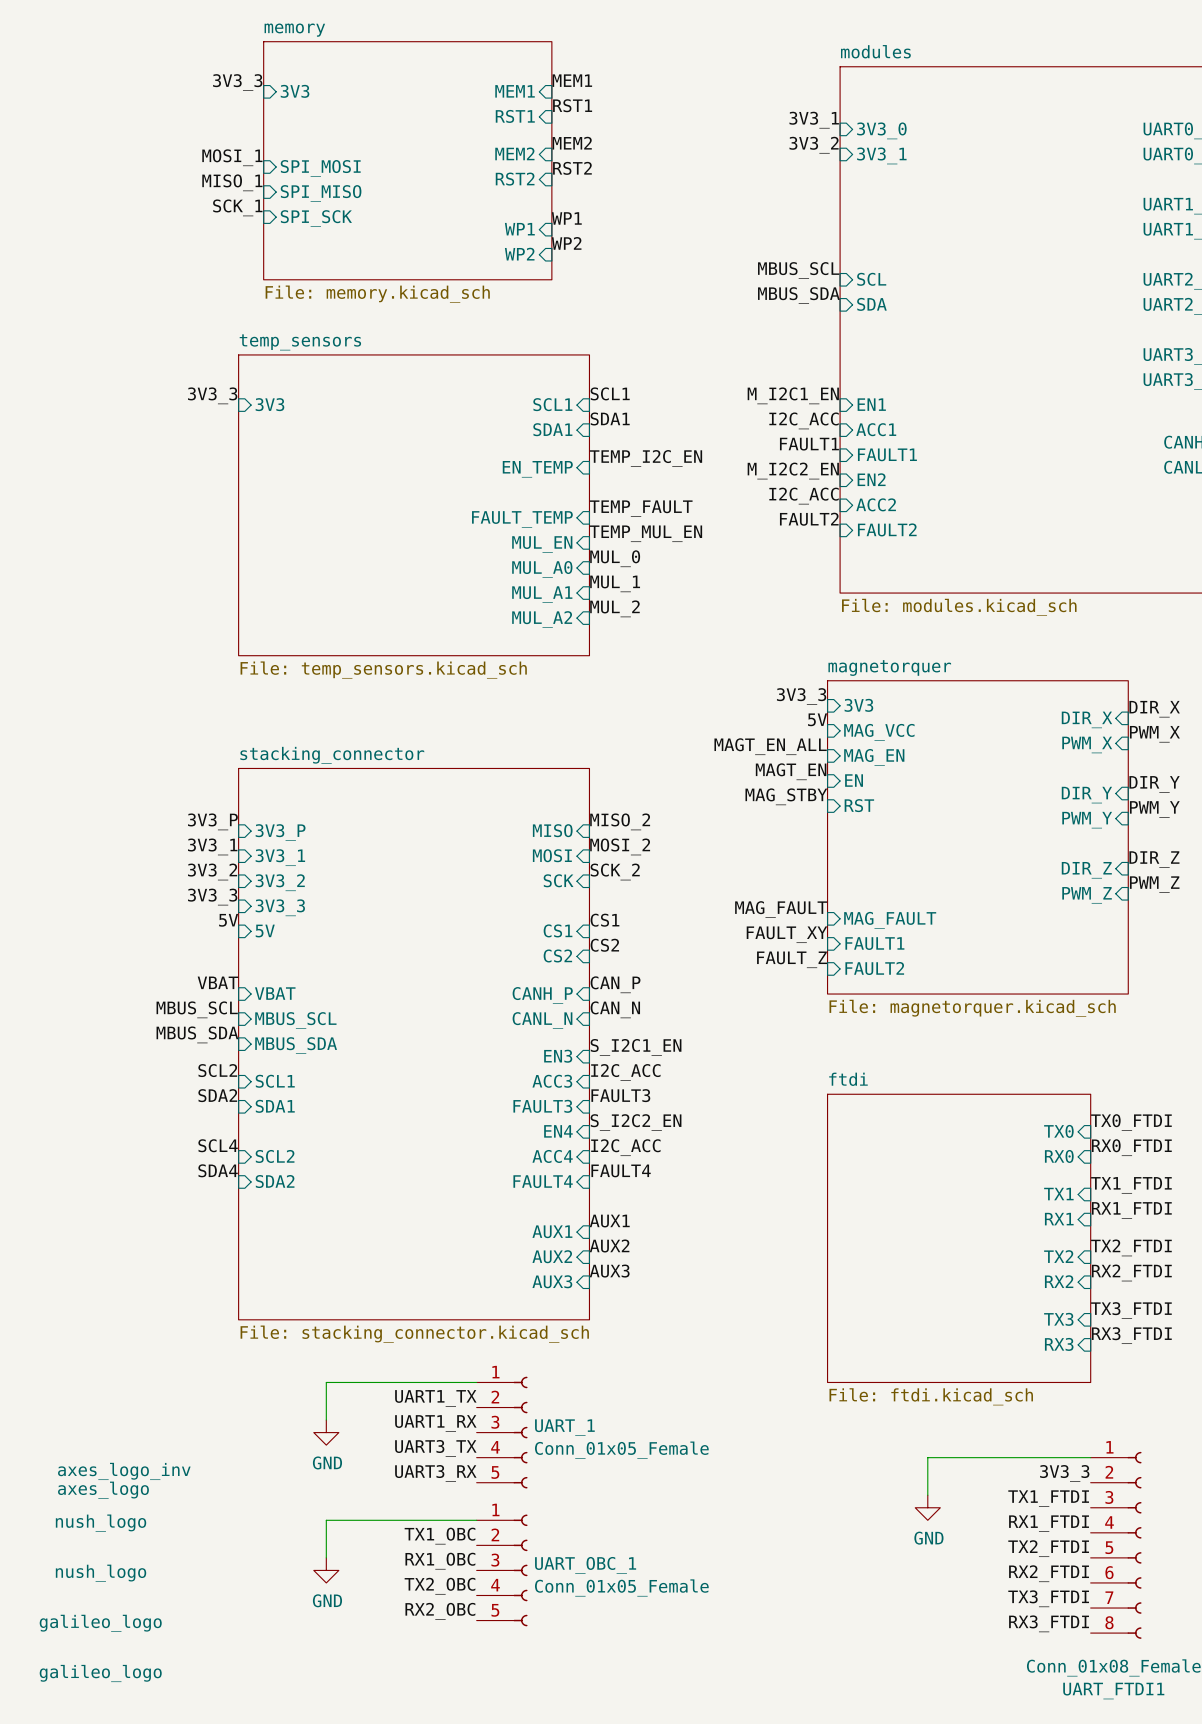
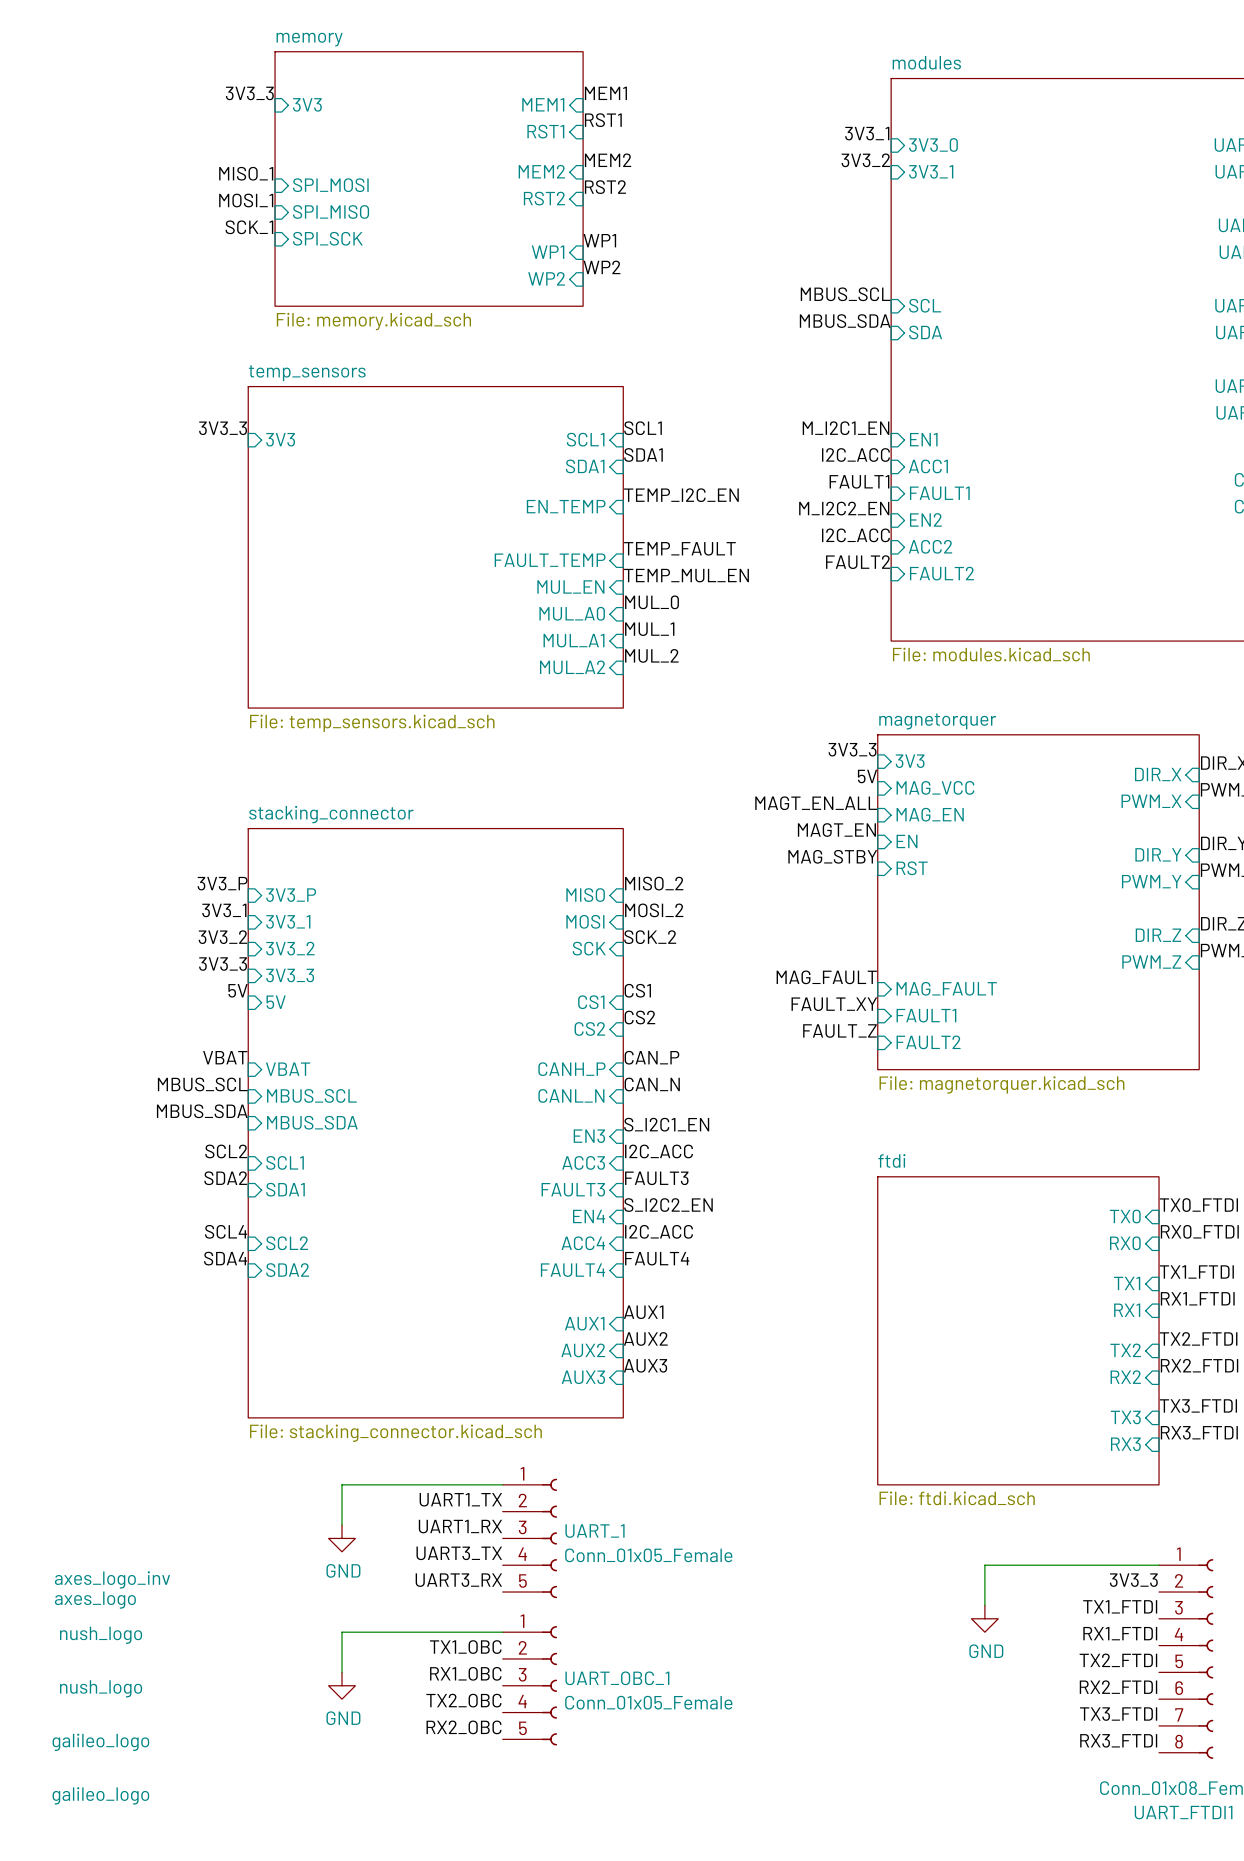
label: MOSI_1 (232, 157) -> MISO_1 (246, 173)
label: MISO_1 (232, 182) -> MOSI_1 (246, 200)

